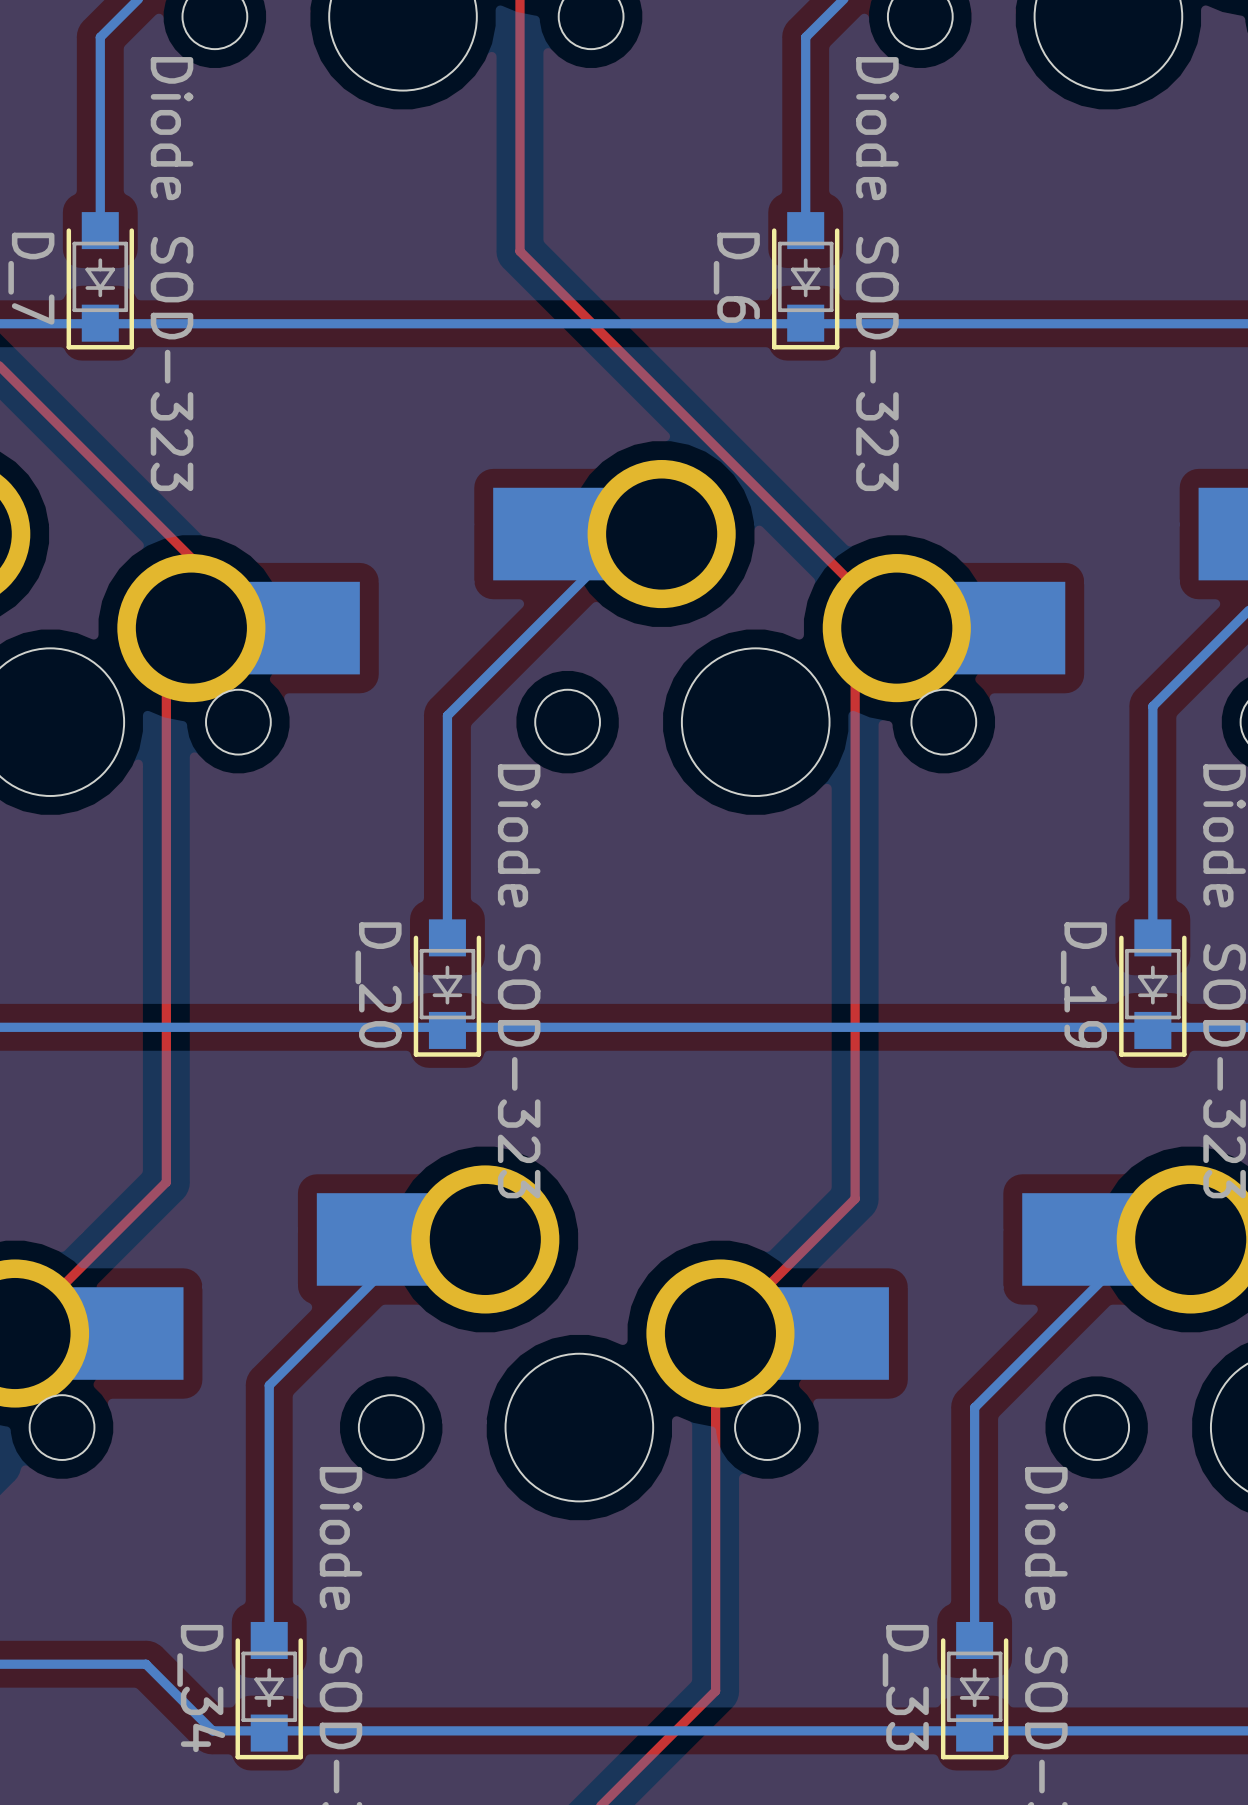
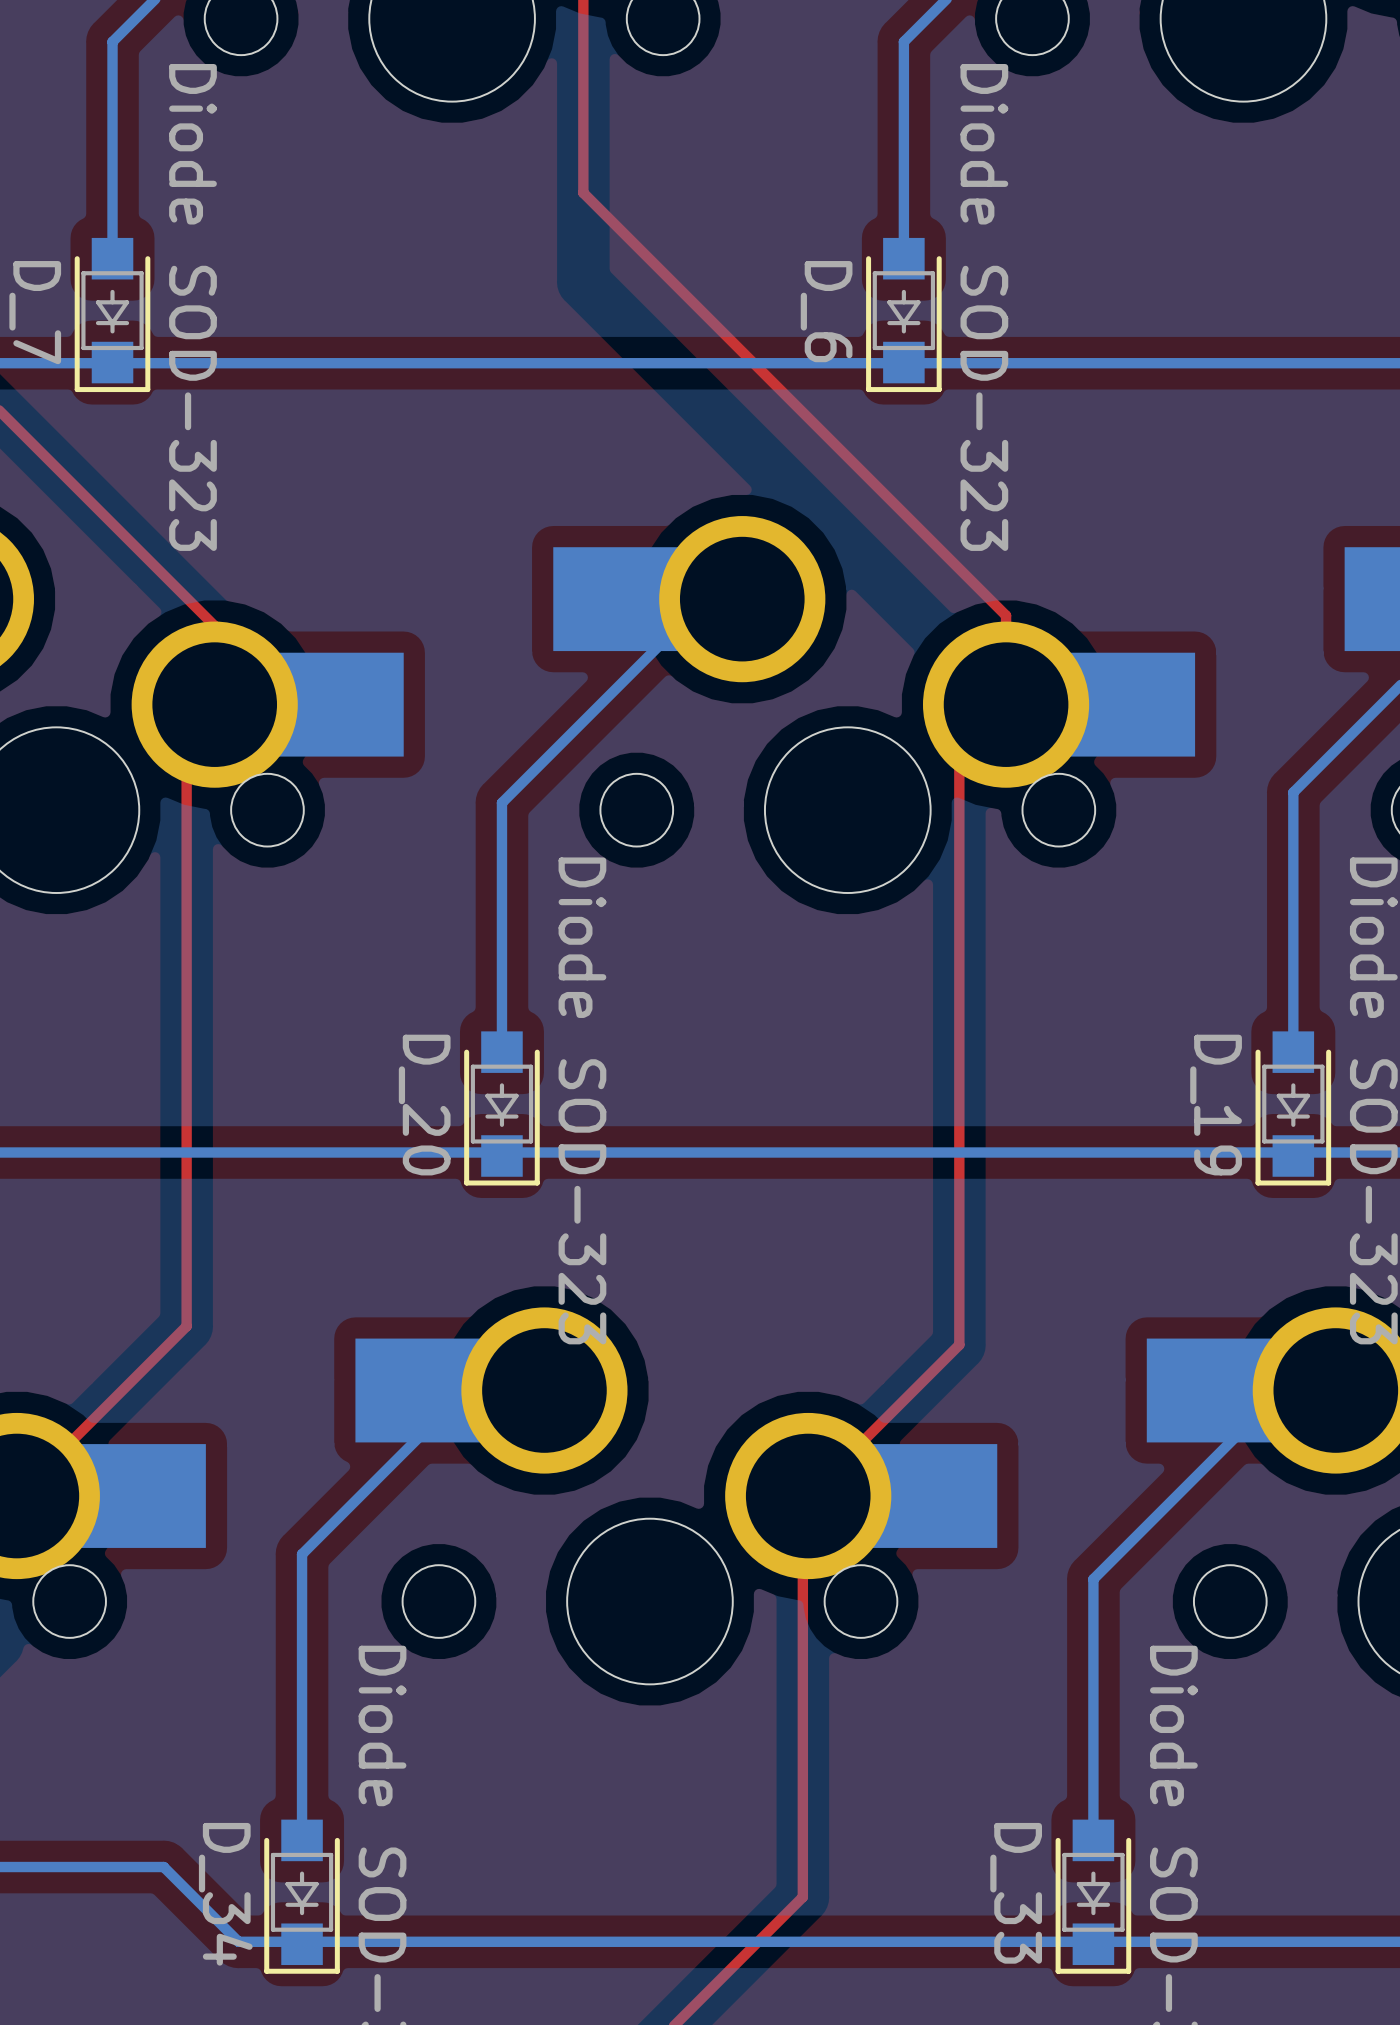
top track: (519, 171) (519, 251) (896, 628) -> (583, 192) (1006, 615) (1006, 704)

